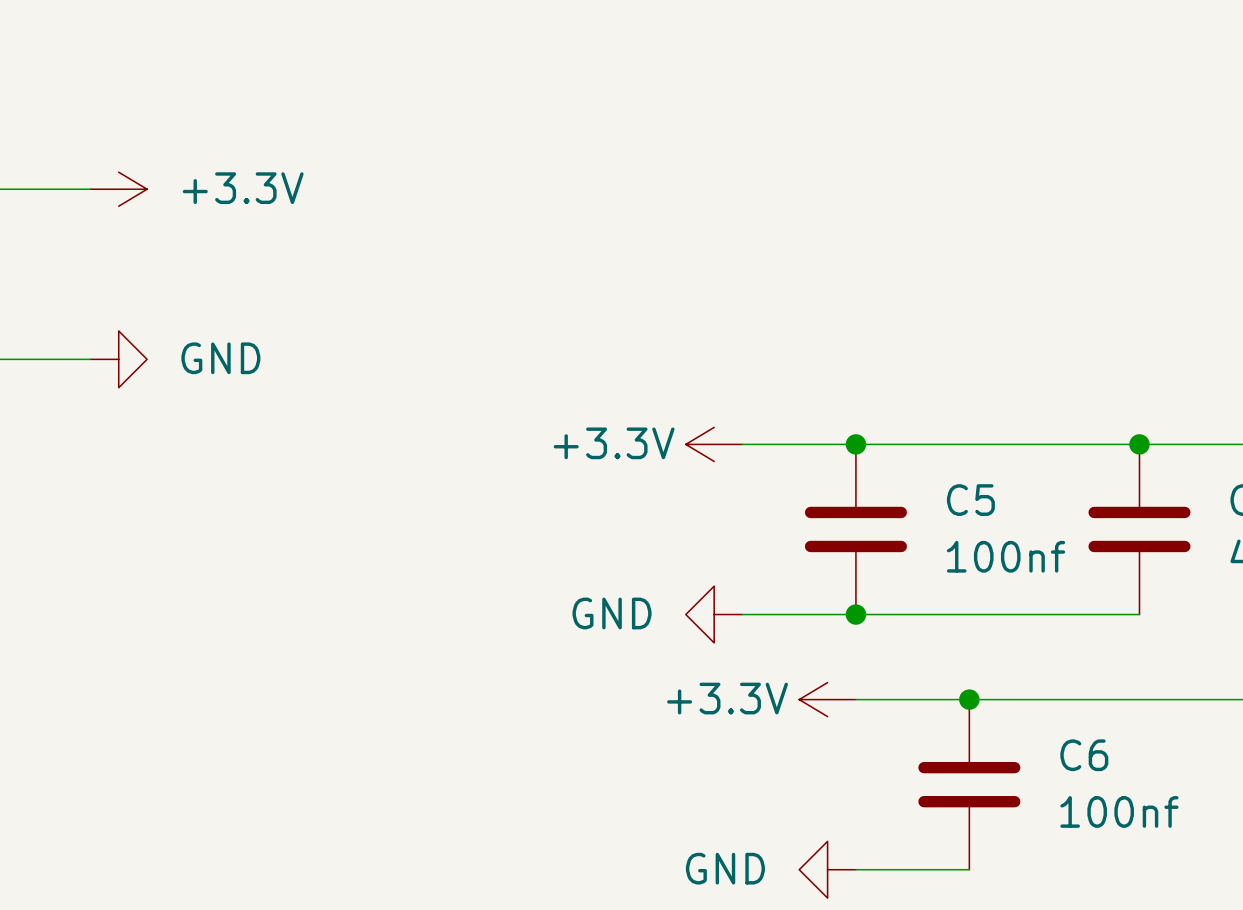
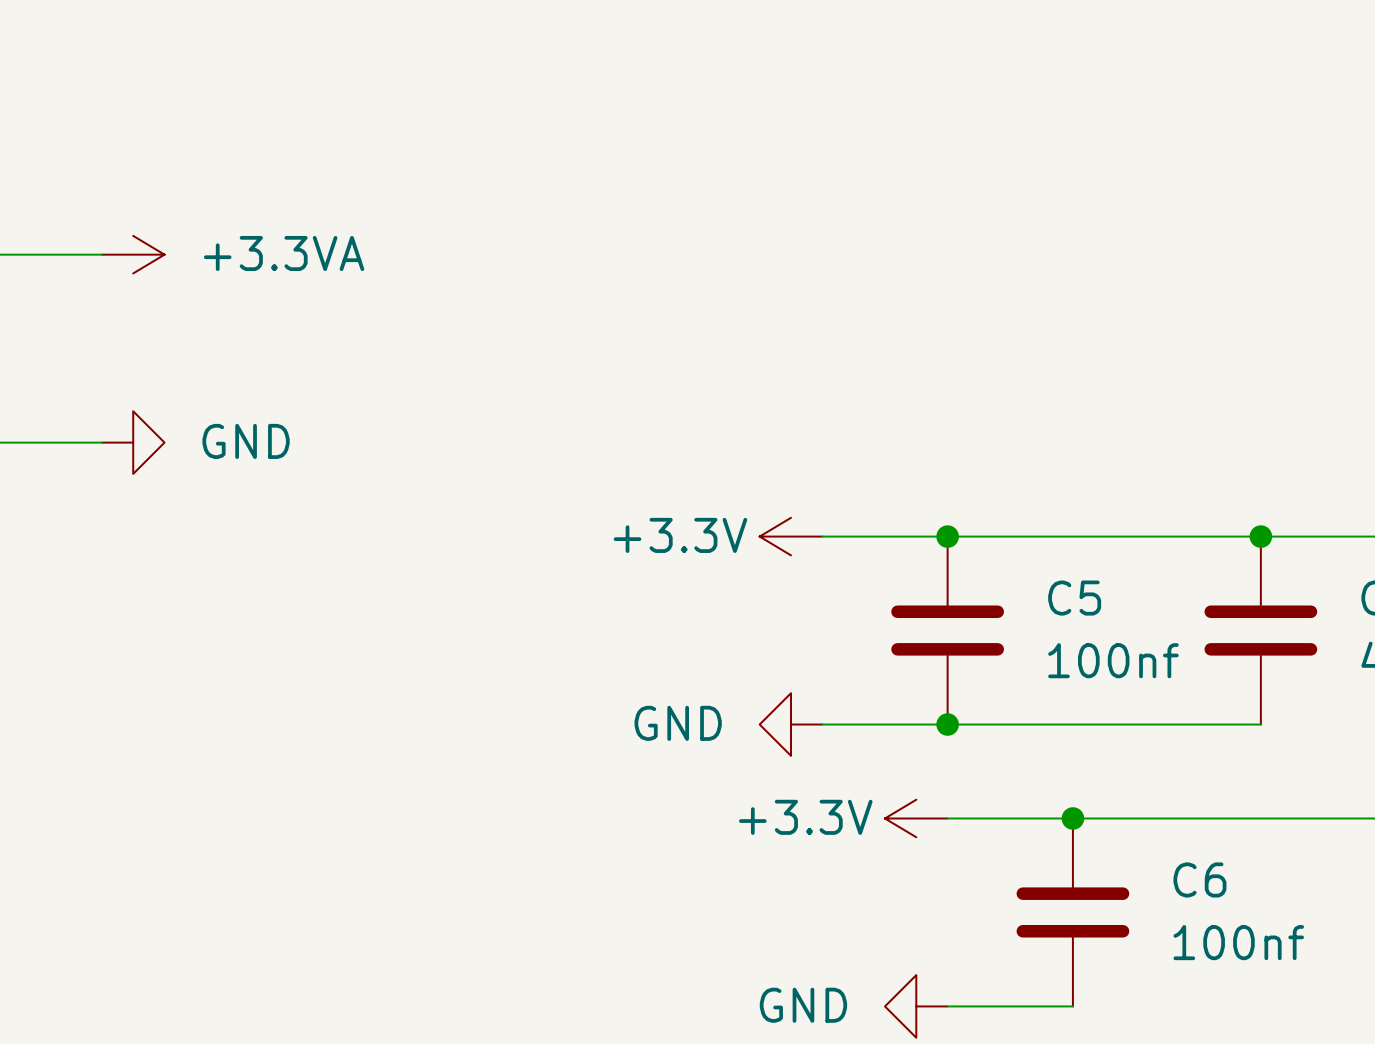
power symbol: +3.3V (118, 189) -> +3.3VA (133, 254)

